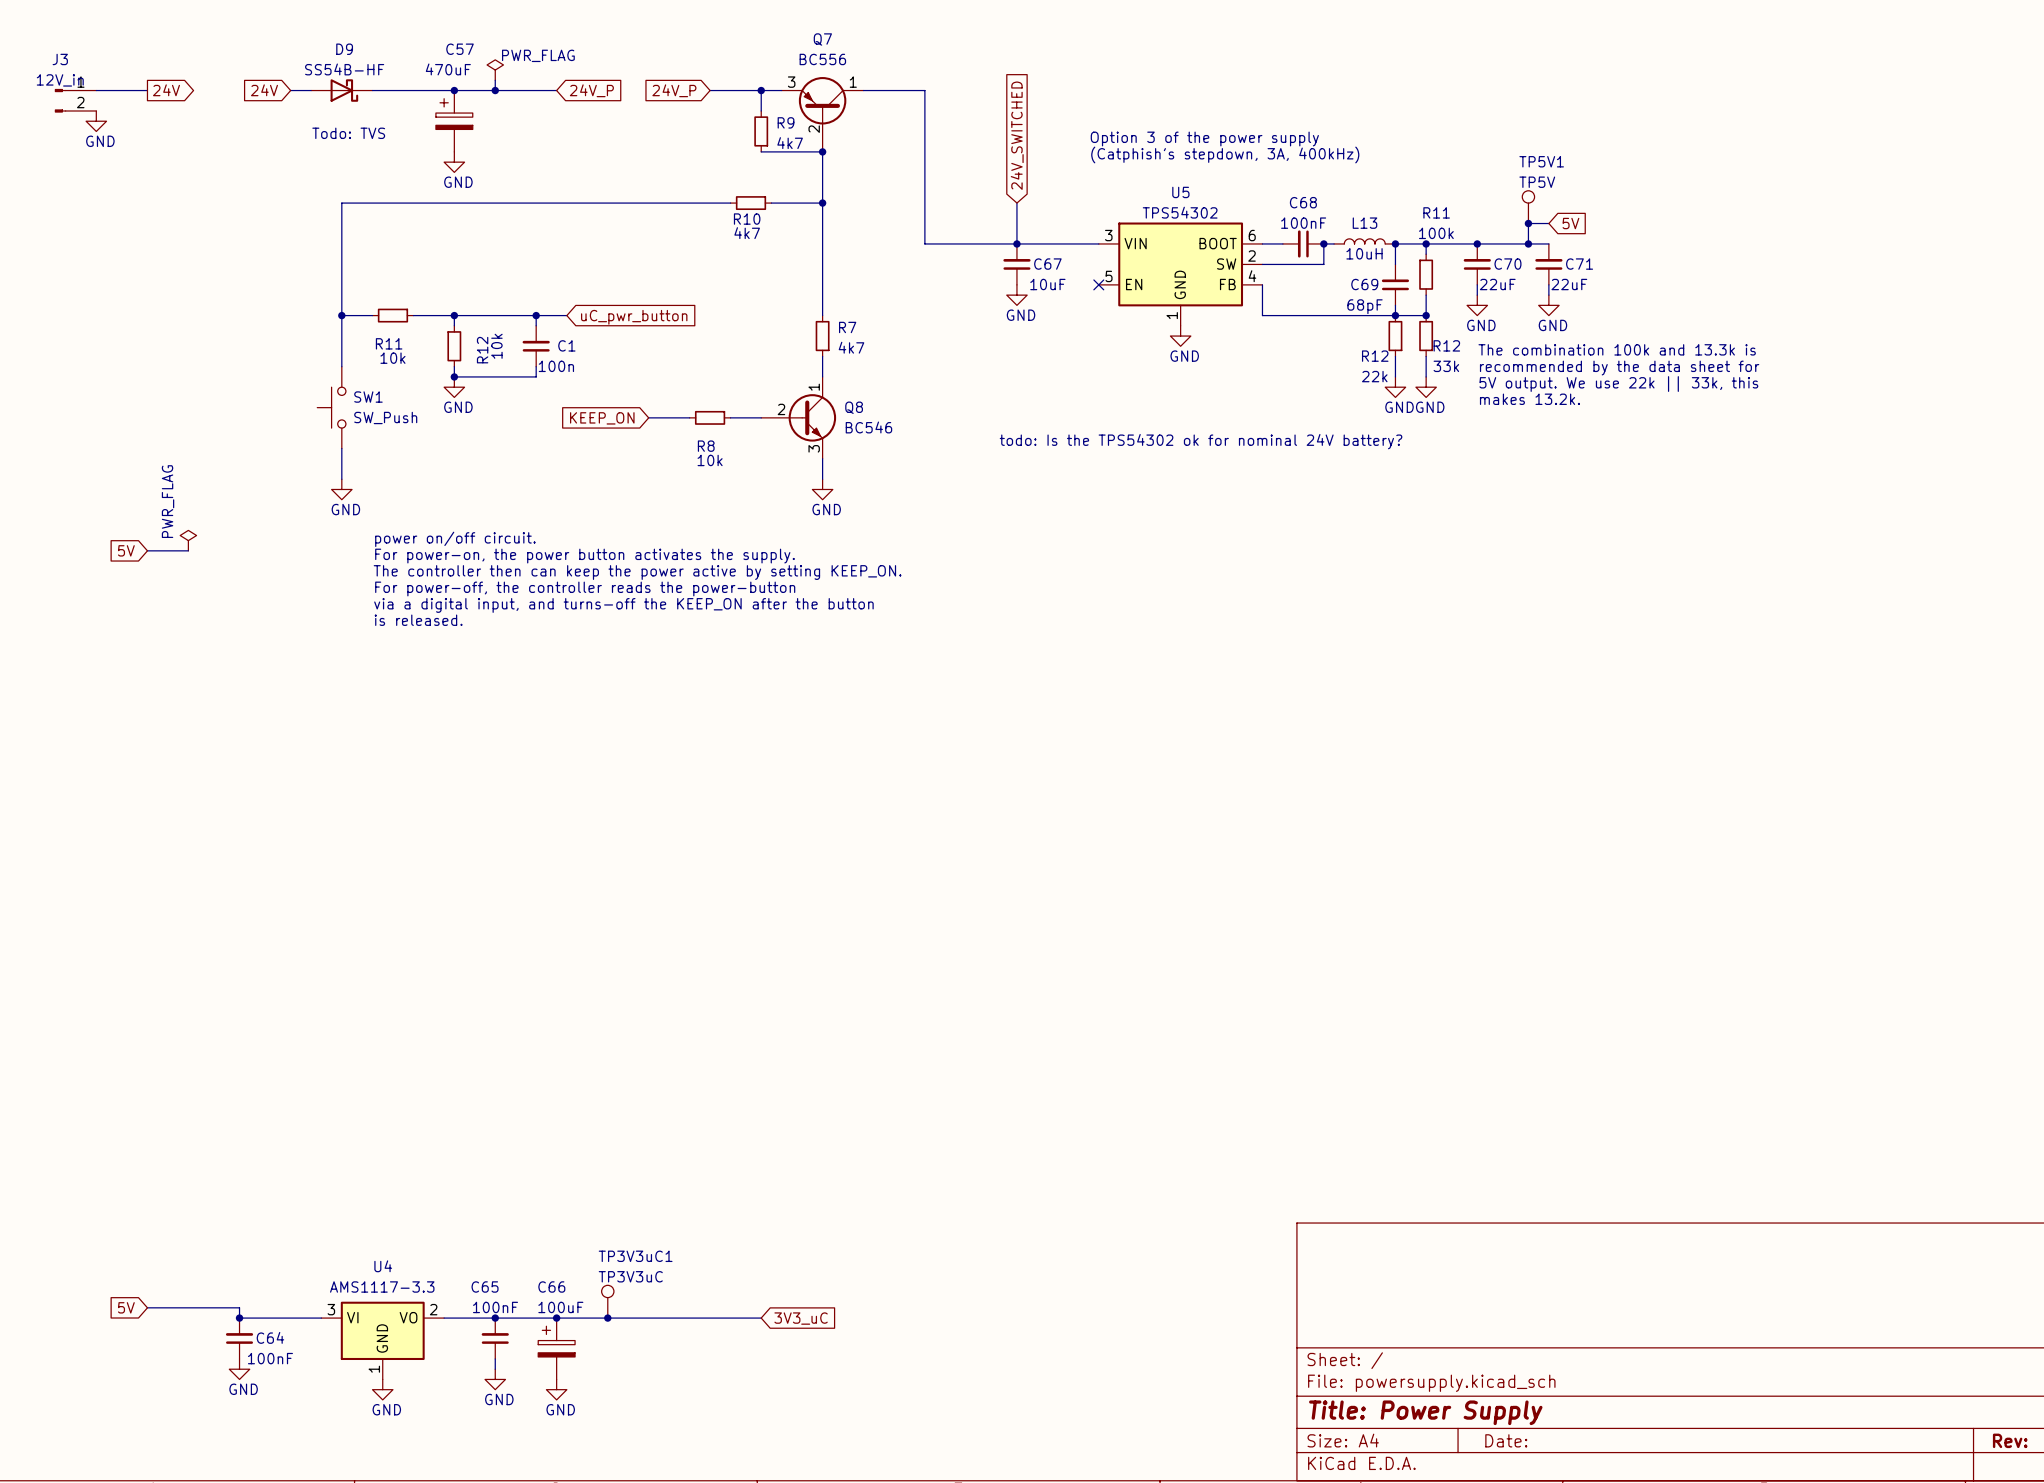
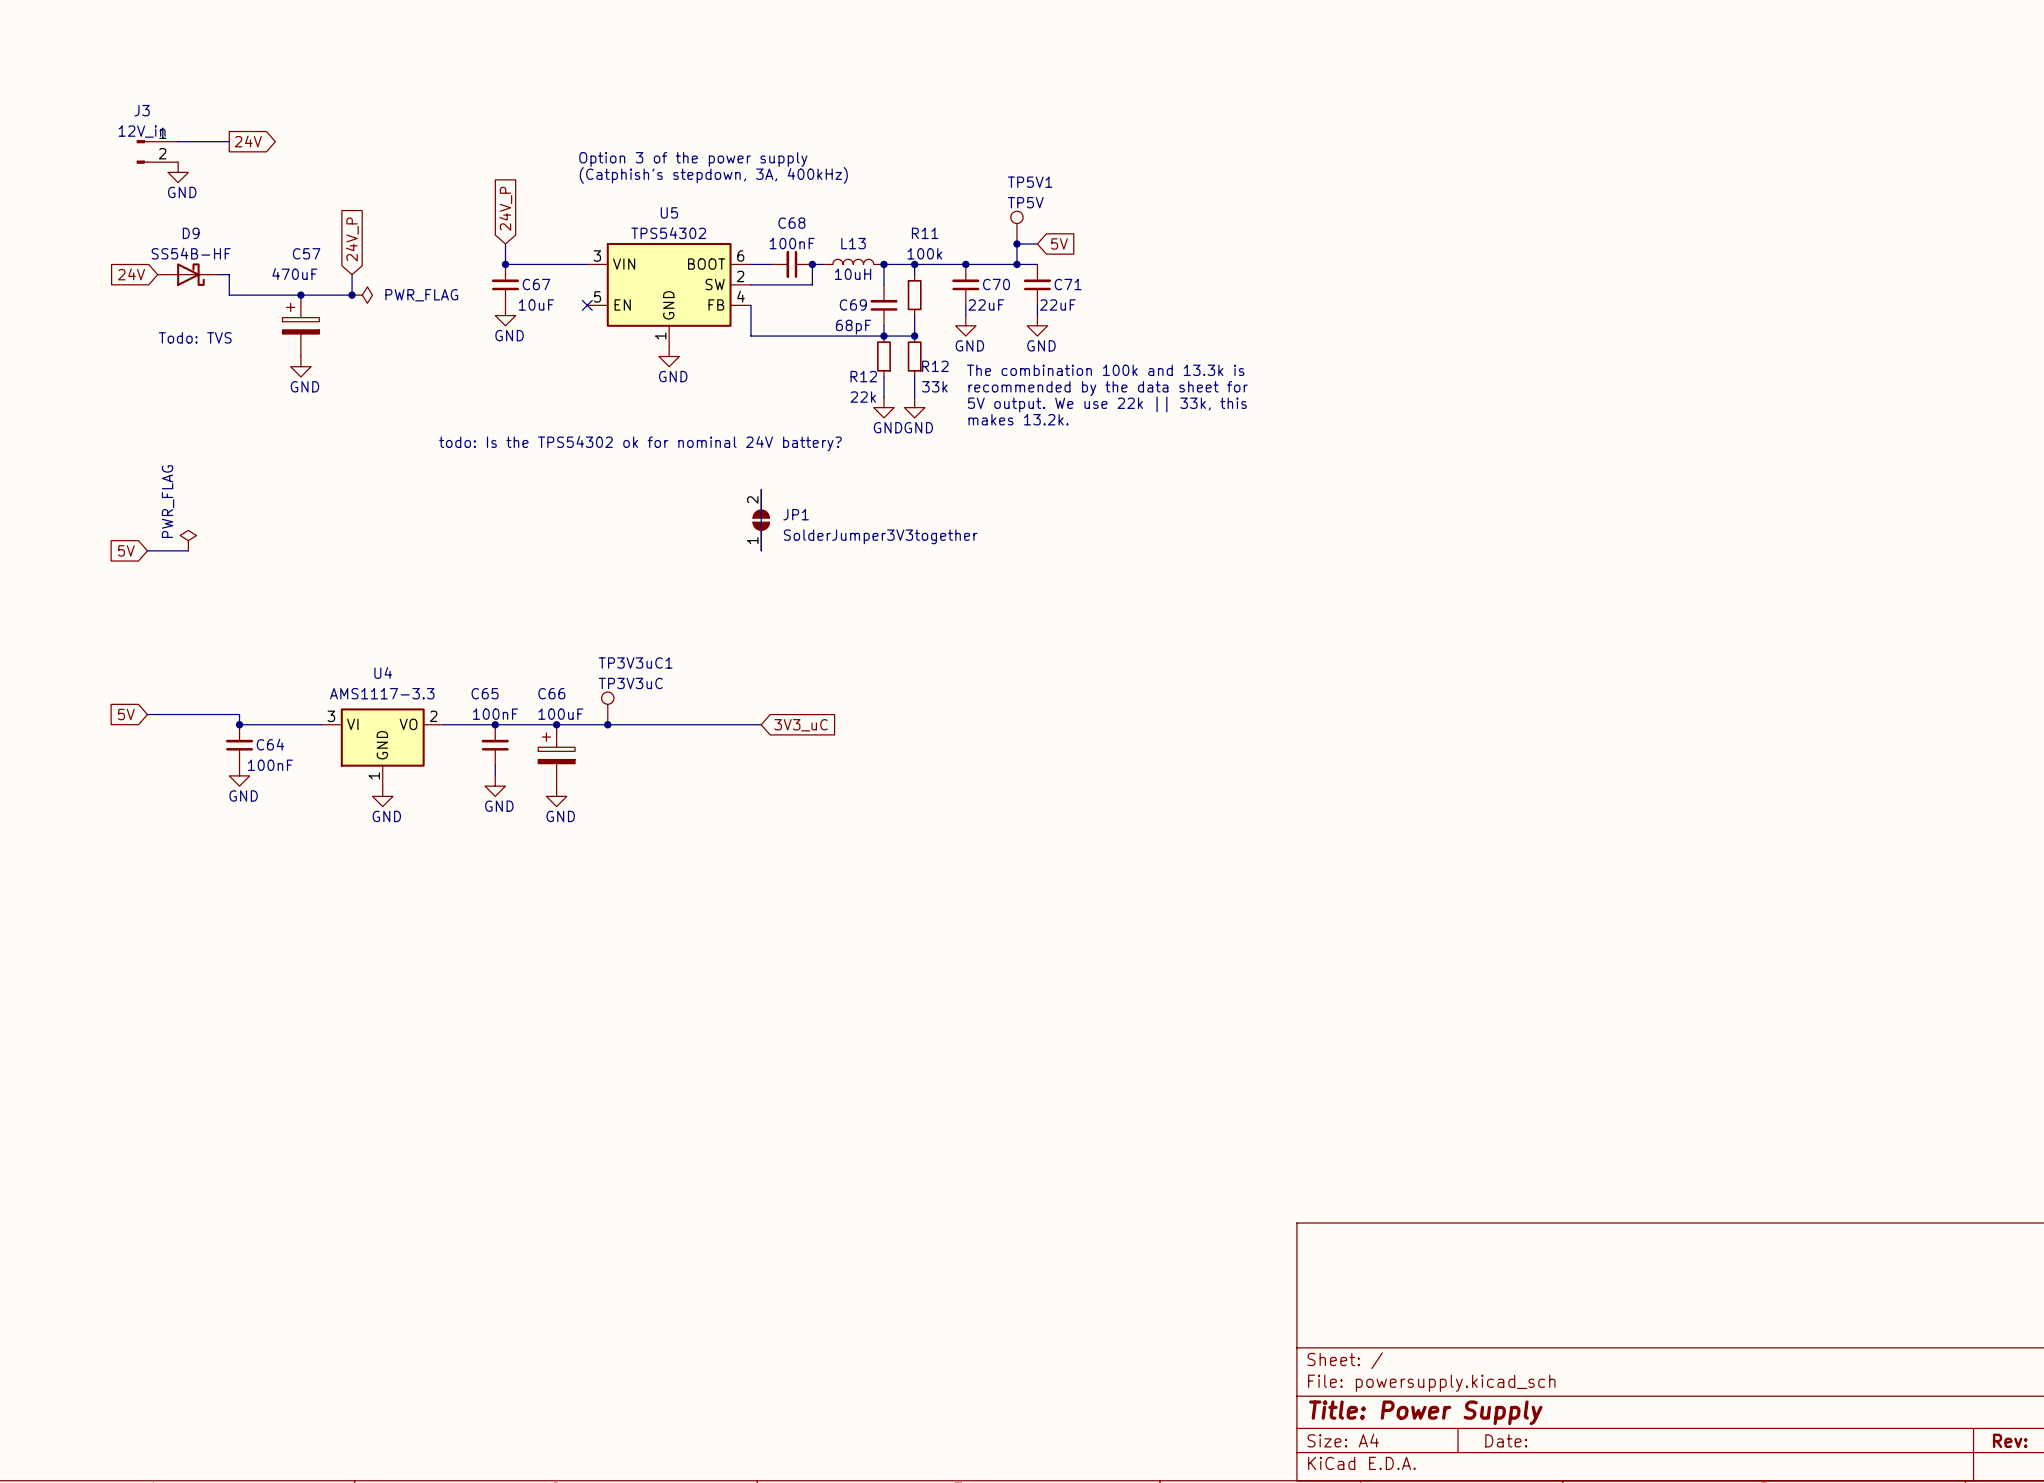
power symbol: PWR_FLAG (495, 70) -> none
wire: (495, 80) (495, 90) -> none
wire: (96, 90) (147, 90) -> (178, 141) (229, 141)
global label: 24V (166, 90) -> none
global label: 24V (264, 90) -> none
wire: (290, 90) (311, 90) -> none
D9 position: (341, 90) -> (188, 274)
wire: (372, 90) (556, 90) -> none
junction: (454, 90) -> none
junction: (495, 90) -> none
global label: 24V_P (591, 90) -> none
global label: 24V_P (674, 90) -> none
wire: (710, 90) (781, 90) -> none
wire: (761, 90) (761, 110) -> none
junction: (761, 90) -> none
wire: (863, 90) (924, 90) (924, 243) (1016, 243) (1016, 203) -> none
J3 position: (75, 100) -> (157, 151)
Q7: BC556 (822, 114) -> none
power symbol position: GND (96, 121) -> GND (178, 172)
C57 position: (454, 121) -> (300, 325)
R9: 4k7 (761, 131) -> none
text: Todo: TVS (348, 133) -> none
global label: 24V_SWITCHED (1017, 135) -> none
text: Option 3 of the power supply (1204, 139) -> none
global label: none -> 24V (248, 141)
wire: (761, 151) (822, 151) (822, 315) -> none
junction: (822, 151) -> none
text: (Catphish's stepdown, 3A, 400kHz) (1225, 154) -> none
text: none -> Option 3 of the power supply (693, 159)
power symbol: GND (454, 162) -> none
text: none -> (Catphish's stepdown, 3A, 400kHz) (713, 175)
wire: (730, 203) (341, 203) (341, 366) -> none
R10: 4k7 (751, 203) -> none
wire: (771, 203) (822, 203) -> none
junction: (822, 203) -> none
TP5V1 position: (1528, 207) -> (1016, 227)
global label: none -> 24V_P (505, 208)
junction: (1528, 223) -> none
wire: (1548, 223) (1528, 223) (1528, 243) -> none
global label: 5V (1570, 223) -> none
global label: none -> 24V_P (352, 239)
L13 position: (1364, 241) -> (853, 261)
wire: none -> (505, 243) (505, 264) (587, 264)
wire: (1037, 243) (1098, 243) -> none
global label: none -> 5V (1059, 243)
wire: (1262, 243) (1282, 243) -> none
C68 position: (1303, 243) -> (791, 264)
junction: (1323, 243) -> none
wire: (1334, 243) (1323, 243) (1323, 264) (1262, 264) -> none
junction: (1395, 243) -> none
wire: (1426, 243) (1426, 254) -> none
junction: (1426, 243) -> none
junction: (1477, 243) -> none
junction: (1528, 243) -> none
wire: (1548, 243) (1395, 243) (1395, 264) -> none
junction: none -> (505, 264)
wire: none -> (751, 264) (771, 264)
junction: none -> (812, 264)
wire: none -> (822, 264) (812, 264) (812, 284) (751, 284)
junction: none -> (883, 264)
wire: none -> (914, 264) (914, 274)
junction: none -> (914, 264)
junction: none -> (965, 264)
junction: none -> (1016, 264)
C67 position: (1016, 264) -> (505, 284)
wire: none -> (1037, 264) (883, 264) (883, 284)
C70 position: (1477, 264) -> (965, 284)
C71 position: (1548, 264) -> (1037, 284)
global label: none -> 24V (131, 274)
wire: none -> (219, 274) (229, 274) (229, 295) (352, 295) (352, 274)
U5 position: (1180, 274) -> (669, 294)
R11: 100k (1426, 274) -> none
no-connect mark: (1098, 284) -> none
wire: (1262, 284) (1262, 315) (1426, 315) (1426, 295) -> none
C69 position: (1395, 284) -> (883, 305)
wire: (1477, 284) (1477, 295) -> none
wire: (1548, 284) (1548, 295) -> none
junction: none -> (300, 295)
junction: none -> (352, 295)
power symbol: none -> PWR_FLAG (362, 295)
R11: none -> 100k (914, 295)
power symbol: GND (1016, 295) -> none
no-connect mark: none -> (587, 305)
wire: none -> (751, 305) (751, 336) (914, 336) (914, 315)
wire: none -> (965, 305) (965, 315)
wire: none -> (1037, 305) (1037, 315)
wire: (1395, 305) (1395, 315) -> none
power symbol: GND (1477, 305) -> none
power symbol: GND (1548, 305) -> none
wire: (341, 315) (372, 315) -> none
junction: (341, 315) -> none
R11: 10k (392, 315) -> none
wire: (413, 315) (566, 315) -> none
wire: (454, 315) (454, 325) -> none
junction: (454, 315) -> none
power symbol: none -> GND (505, 315)
wire: (536, 315) (536, 325) -> none
junction: (536, 315) -> none
junction: (1395, 315) -> none
junction: (1426, 315) -> none
global label: uC_pwr_button (634, 317) -> none
wire: none -> (883, 325) (883, 336)
power symbol: none -> GND (965, 325)
power symbol: none -> GND (1037, 325)
R7: 4k7 (822, 336) -> none
junction: none -> (883, 336)
junction: none -> (914, 336)
power symbol: GND (1180, 336) -> none
R12: 22k (1395, 336) -> none
R12: 33k (1426, 336) -> none
text: none -> Todo: TVS (195, 337)
R12: 10k (454, 346) -> none
C1: 100n (536, 346) -> none
text: The combination 100k and 13.3k is (1617, 349) -> none
power symbol: none -> GND (669, 356)
wire: (822, 356) (822, 376) -> (883, 376) (883, 397)
R12: none -> 22k (883, 356)
R12: none -> 33k (914, 356)
wire: (1395, 356) (1395, 376) -> none
wire: (1426, 356) (1426, 376) -> none
power symbol: none -> GND (300, 366)
wire: (454, 366) (454, 376) (536, 376) (536, 366) -> none
text: recommended by the data sheet for (1619, 368) -> none
text: none -> The combination 100k and 13.3k is (1105, 370)
junction: (454, 376) -> none
text: 5V output. We use 22k || 33k, this (1618, 384) -> none
power symbol: GND (454, 387) -> none
power symbol: GND (1395, 387) -> none
power symbol: GND (1426, 387) -> none
text: none -> recommended by the data sheet for (1108, 388)
text: makes 13.2k. (1529, 399) -> none
text: none -> 5V output. We use 22k || 33k, this (1107, 404)
SW1: SW_Push (331, 407) -> none
power symbol: none -> GND (883, 407)
power symbol: none -> GND (914, 407)
wire: (648, 417) (689, 417) -> none
R8: 10k (710, 417) -> none
wire: (730, 417) (761, 417) -> none
Q8: BC546 (798, 417) -> none
global label: KEEP_ON (602, 418) -> none
text: none -> makes 13.2k. (1018, 419)
text: todo: Is the TPS54302 ok for nominal 24V battery? (1201, 441) -> none
text: none -> todo: Is the TPS54302 ok for nominal 24V battery? (640, 443)
wire: (341, 448) (341, 479) -> none
wire: (822, 458) (822, 479) -> (914, 376) (914, 397)
power symbol: GND (341, 489) -> none
wire: none -> (761, 489) (761, 550)
power symbol: GND (822, 489) -> none
JP1: none -> SolderJumper3V3together (761, 520)
text: power on/off circuit. (455, 539) -> none
text: For power-on, the power button activates the supply. (584, 556) -> none
text: The controller then can keep the power active by setting KEEP_ON. (637, 572) -> none
text: For power-off, the controller reads the power-button (585, 588) -> none
text: via a digital input, and turns-off the KEEP_ON after the button (623, 605) -> none
text: is released. (418, 620) -> none
global label: none -> 5V (126, 714)
wire: none -> (147, 714) (239, 714) (239, 724) (321, 724)
junction: none -> (239, 724)
wire: none -> (444, 724) (761, 724)
junction: none -> (495, 724)
junction: none -> (556, 724)
junction: none -> (607, 724)
global label: none -> 3V3_uC (801, 725)
wire: none -> (495, 765) (495, 775)
power symbol: none -> GND (239, 775)
power symbol: none -> GND (495, 786)
power symbol: none -> GND (382, 796)
power symbol: none -> GND (556, 796)
TP3V3uC1 position: (607, 1301) -> (607, 708)
global label: 5V (126, 1307) -> none
wire: (147, 1307) (239, 1307) (239, 1318) (321, 1318) -> none
junction: (239, 1318) -> none
wire: (444, 1318) (761, 1318) -> none
junction: (495, 1318) -> none
junction: (556, 1318) -> none
junction: (607, 1318) -> none
global label: 3V3_uC (801, 1318) -> none
C64 position: (239, 1338) -> (239, 745)
C65 position: (495, 1338) -> (495, 745)
U4 position: (382, 1340) -> (382, 747)
C66 position: (556, 1348) -> (556, 755)
wire: (495, 1358) (495, 1369) -> none
power symbol: GND (239, 1369) -> none
power symbol: GND (495, 1379) -> none
power symbol: GND (382, 1389) -> none
power symbol: GND (556, 1389) -> none

